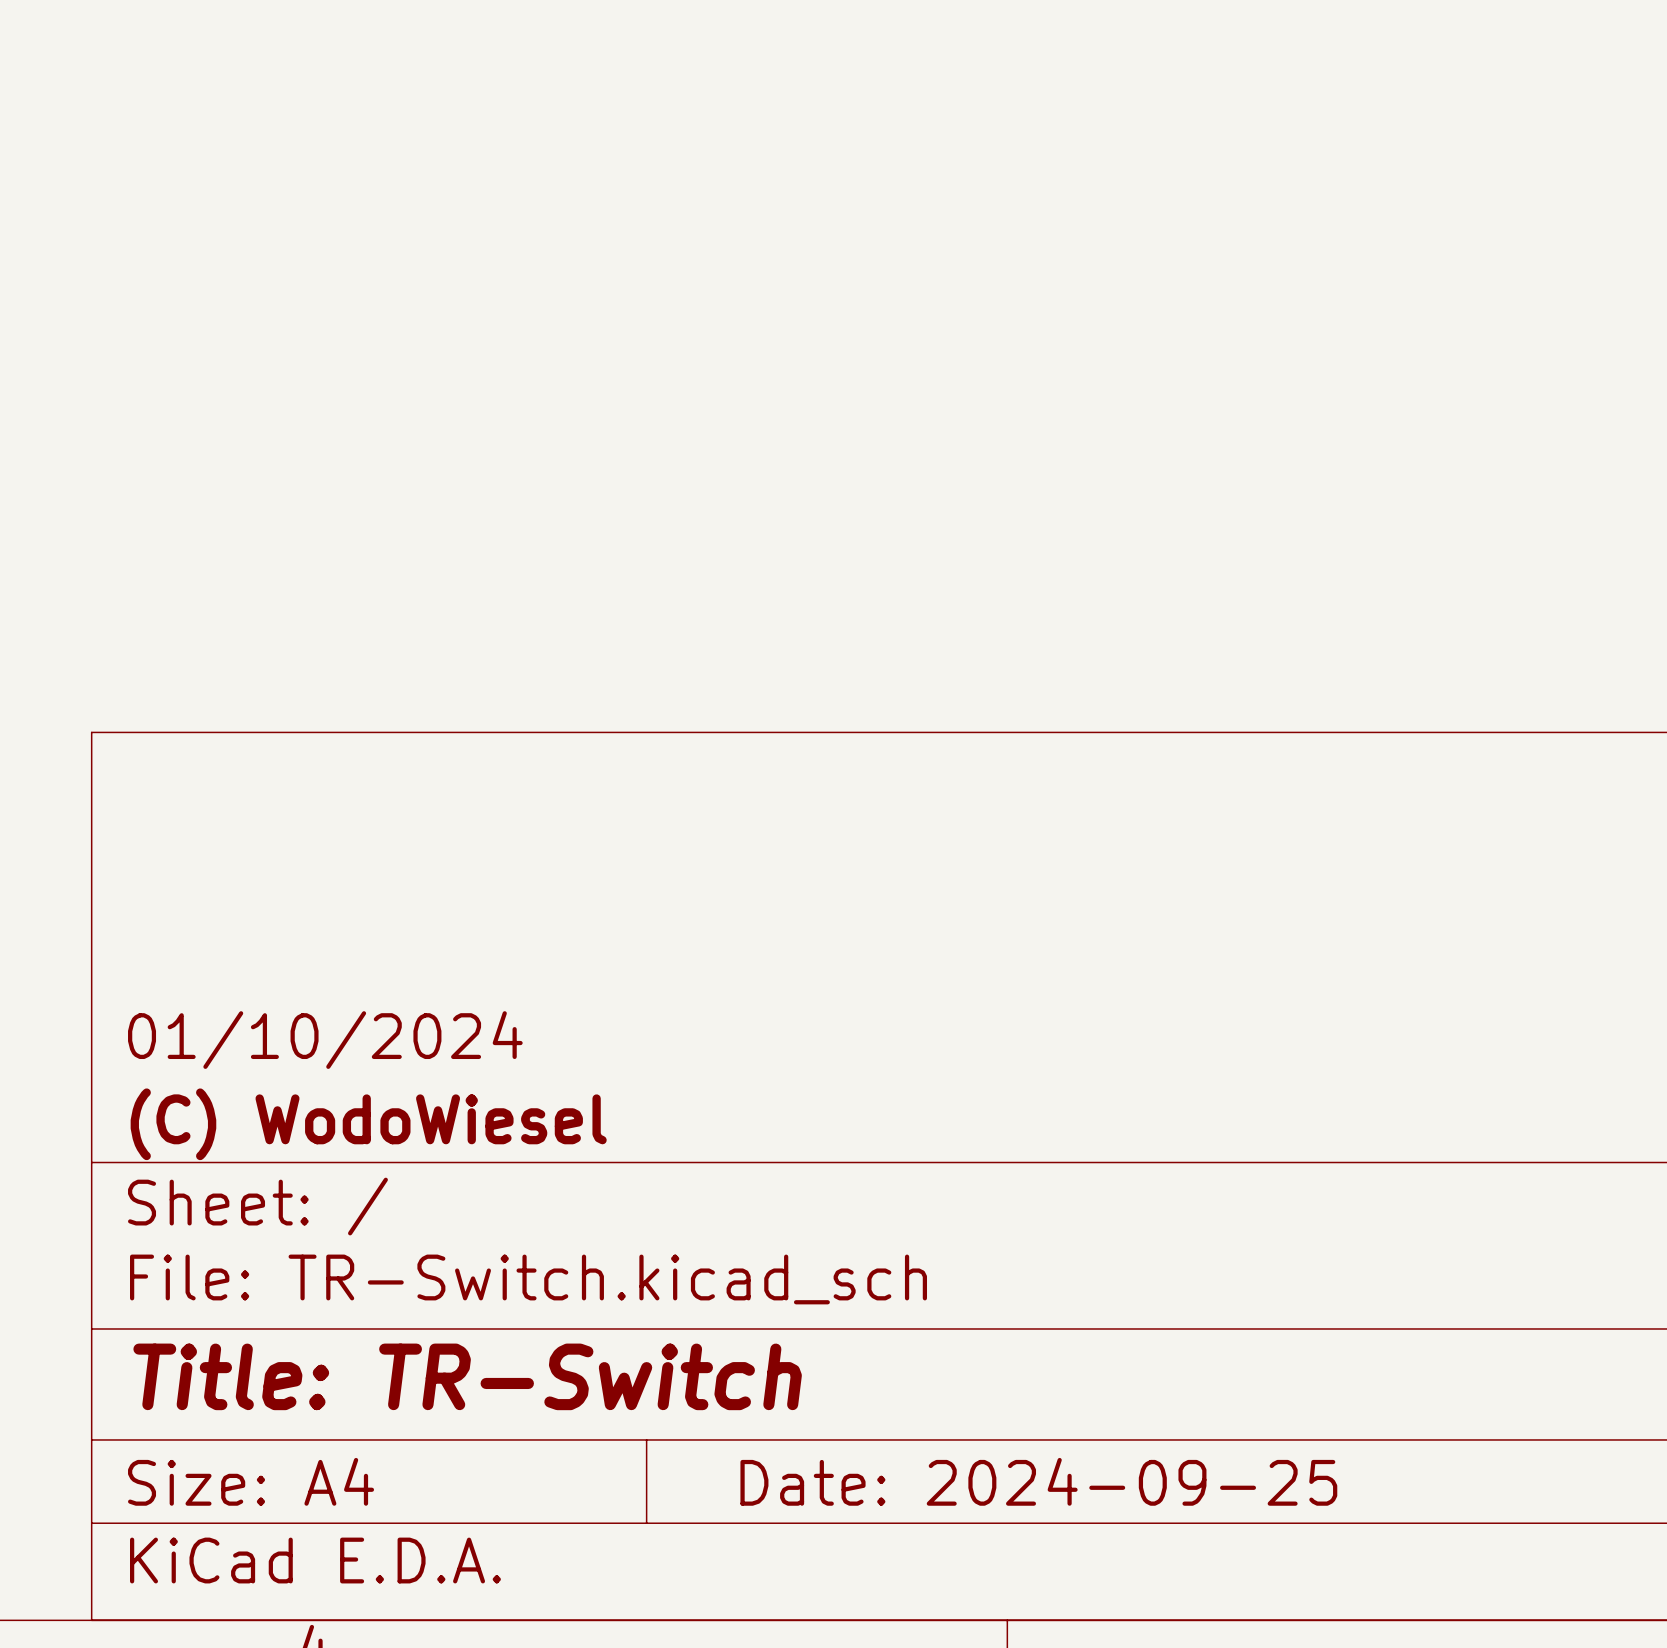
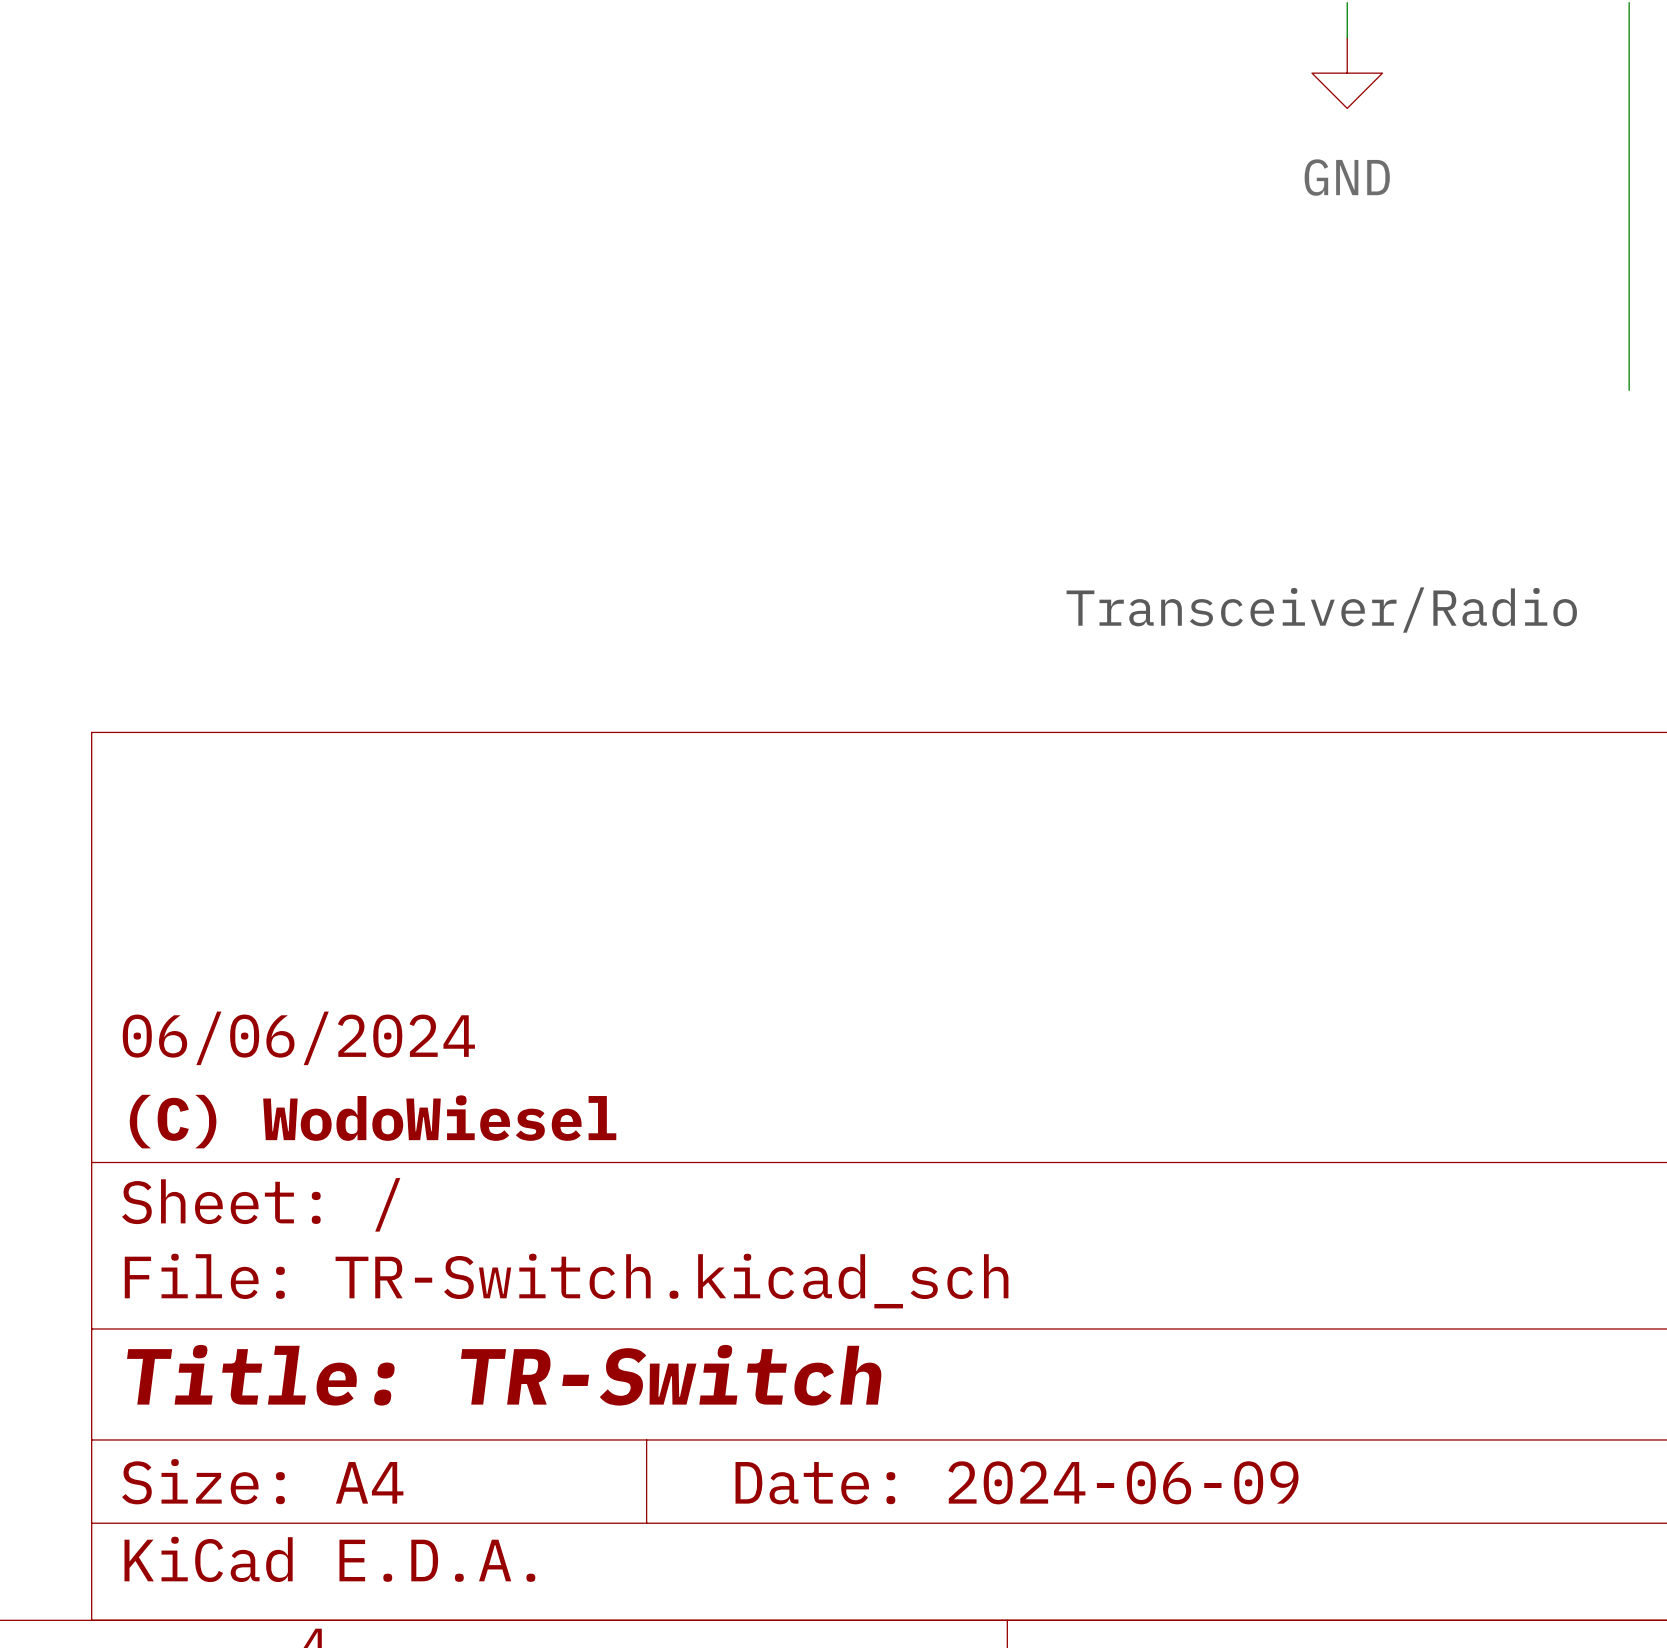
wire: none -> (1347, 2) (1347, 37)
wire: none -> (1629, 2) (1629, 390)
power symbol: none -> GND (1347, 73)
text: none -> Transceiver/Radio (1321, 610)
title block: 01/10/2024 (325, 1040) -> 06/06/2024 (298, 1038)
title block: Date: 2024-09-25 (1038, 1481) -> Date: 2024-06-09 (1017, 1482)

